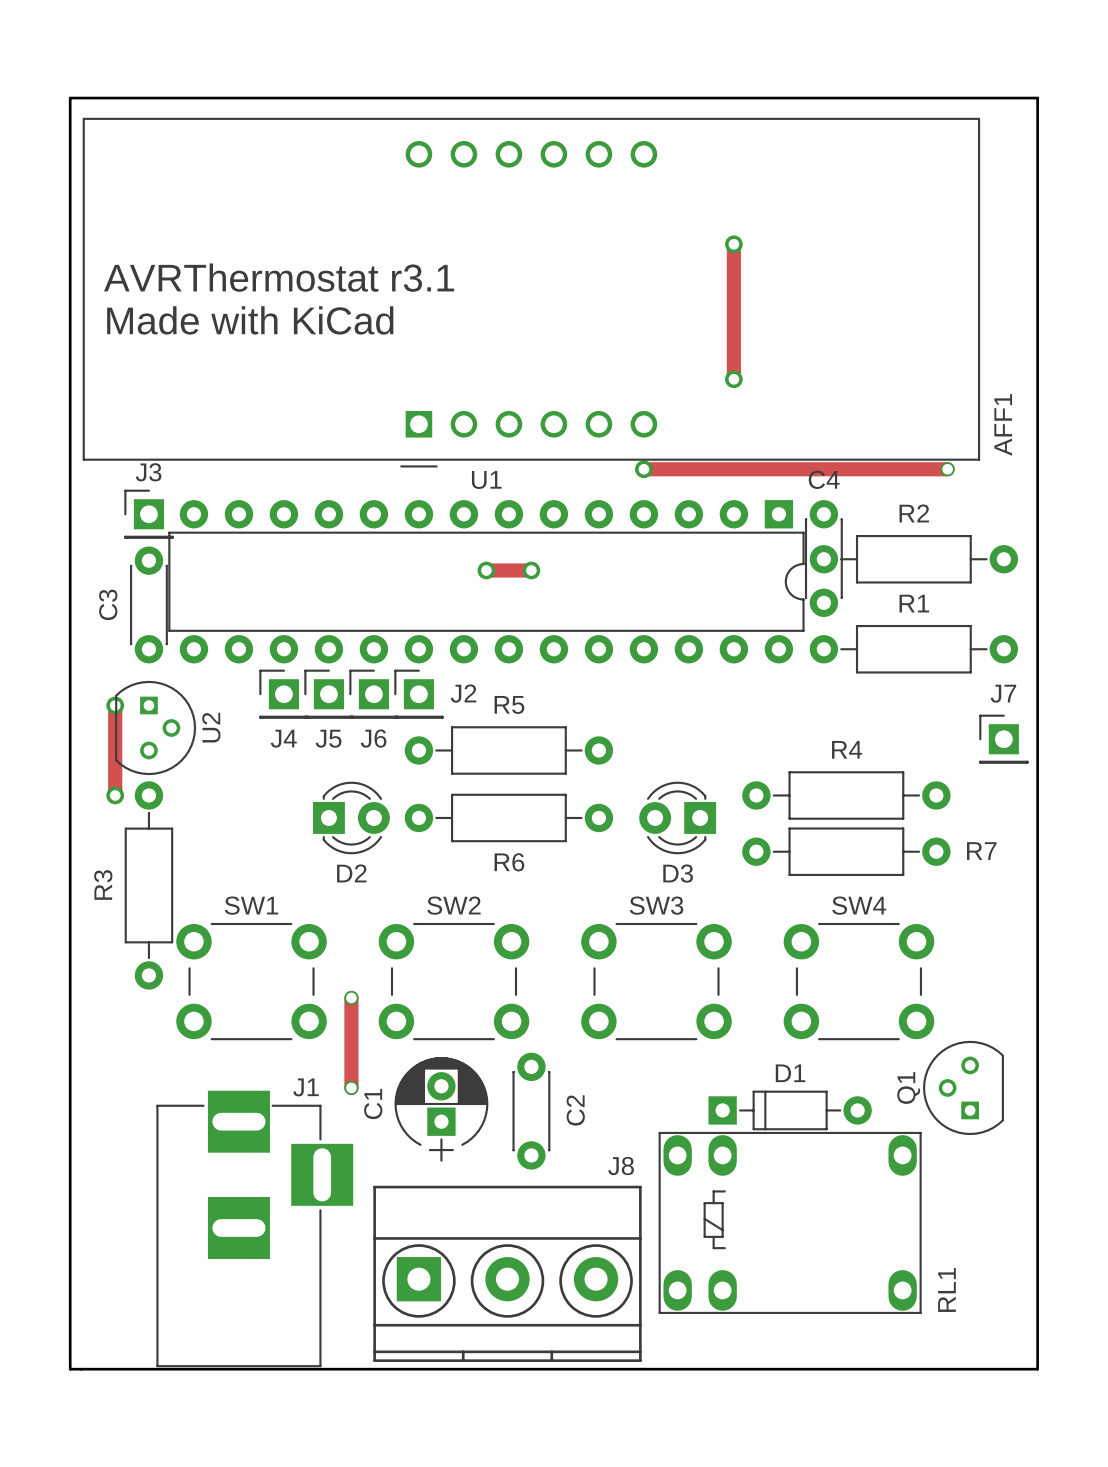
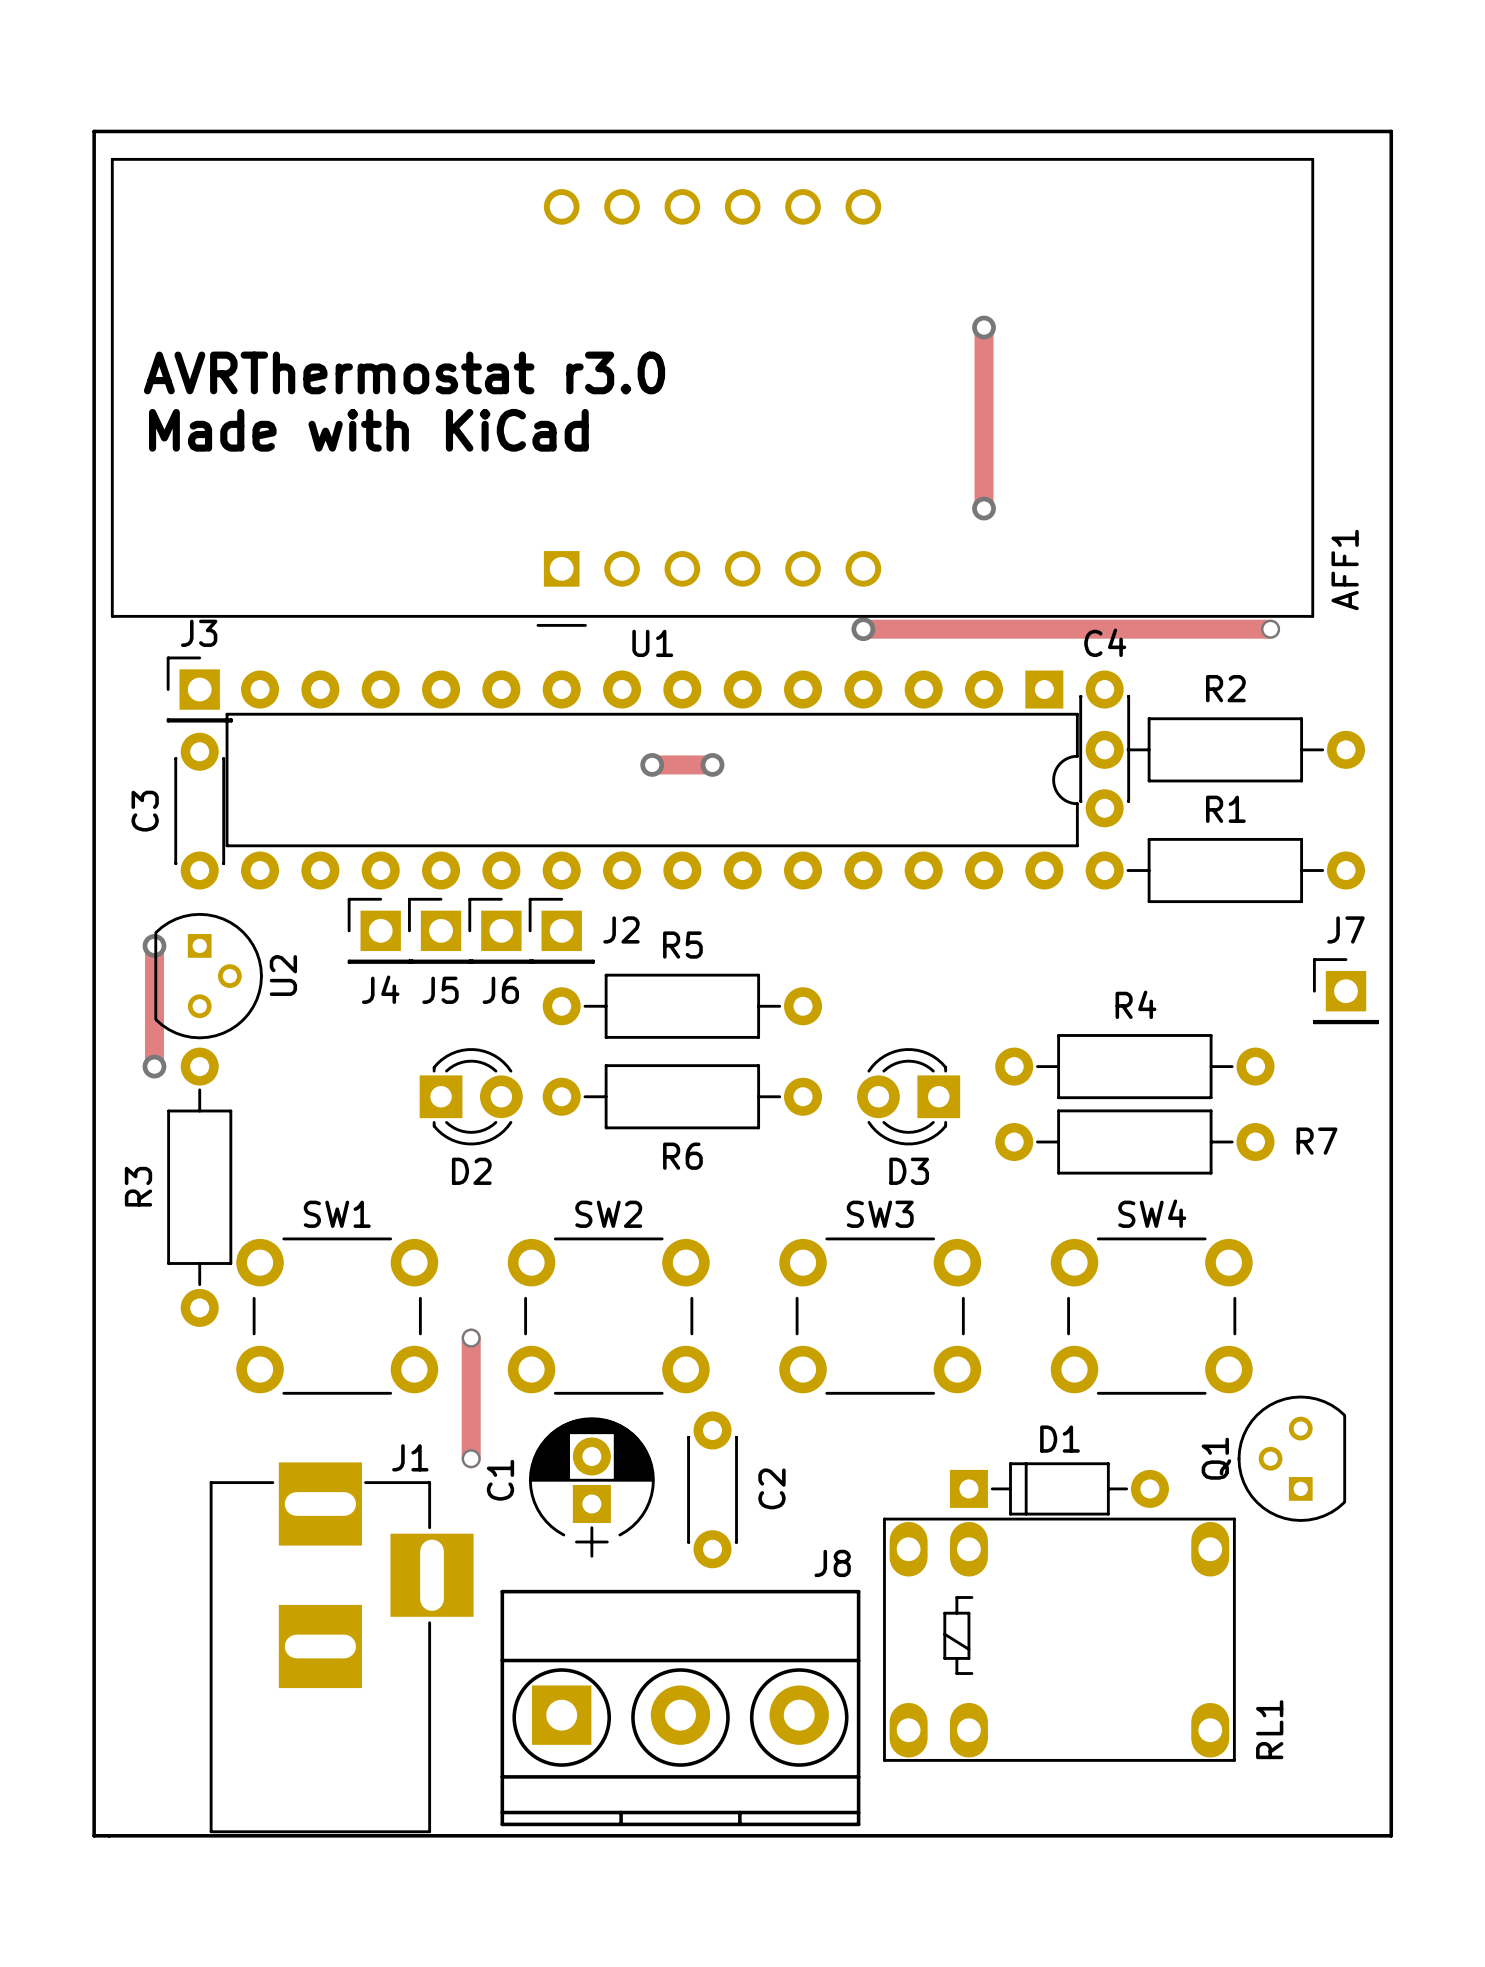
text: AVRThermostat r3.1 (279, 277) -> AVRThermostat r3.0 (404, 372)

